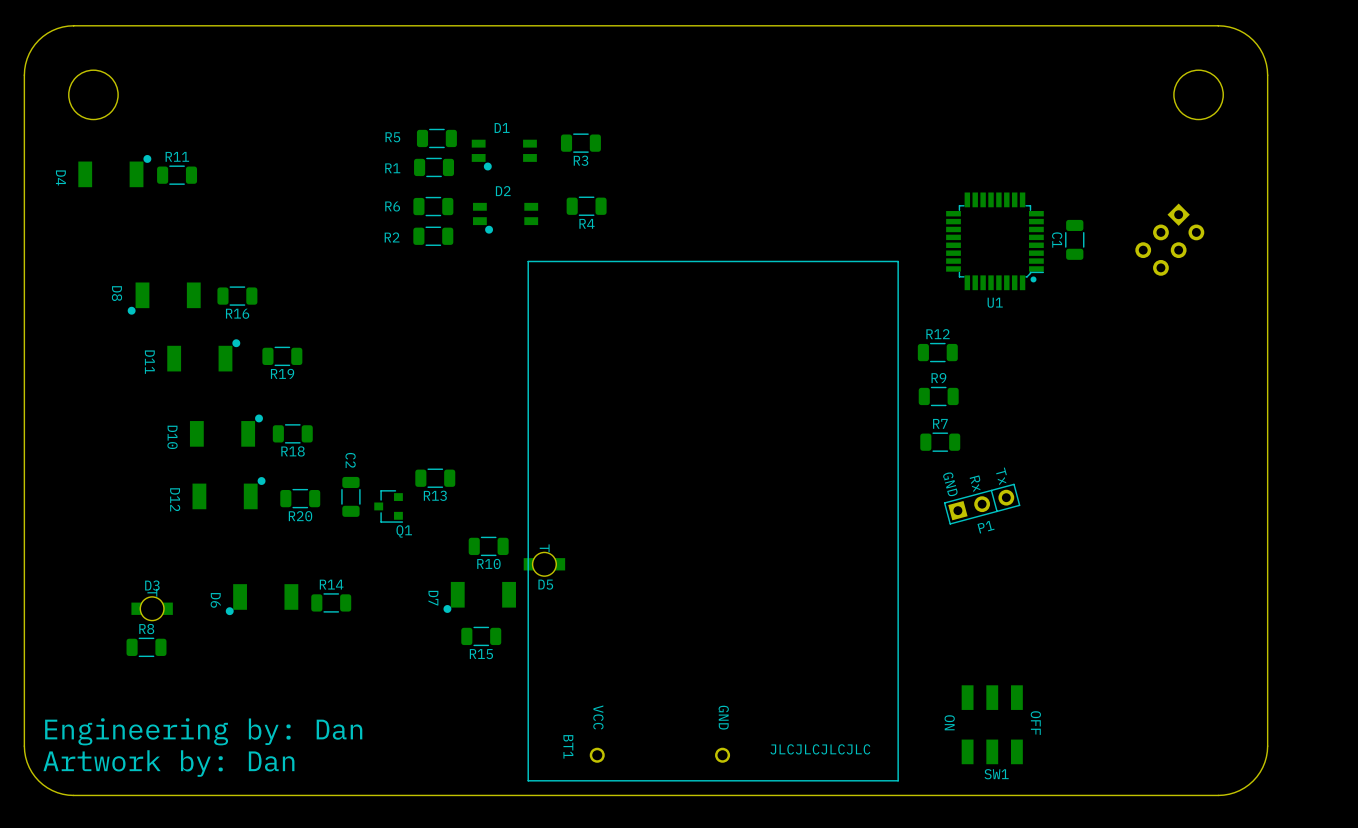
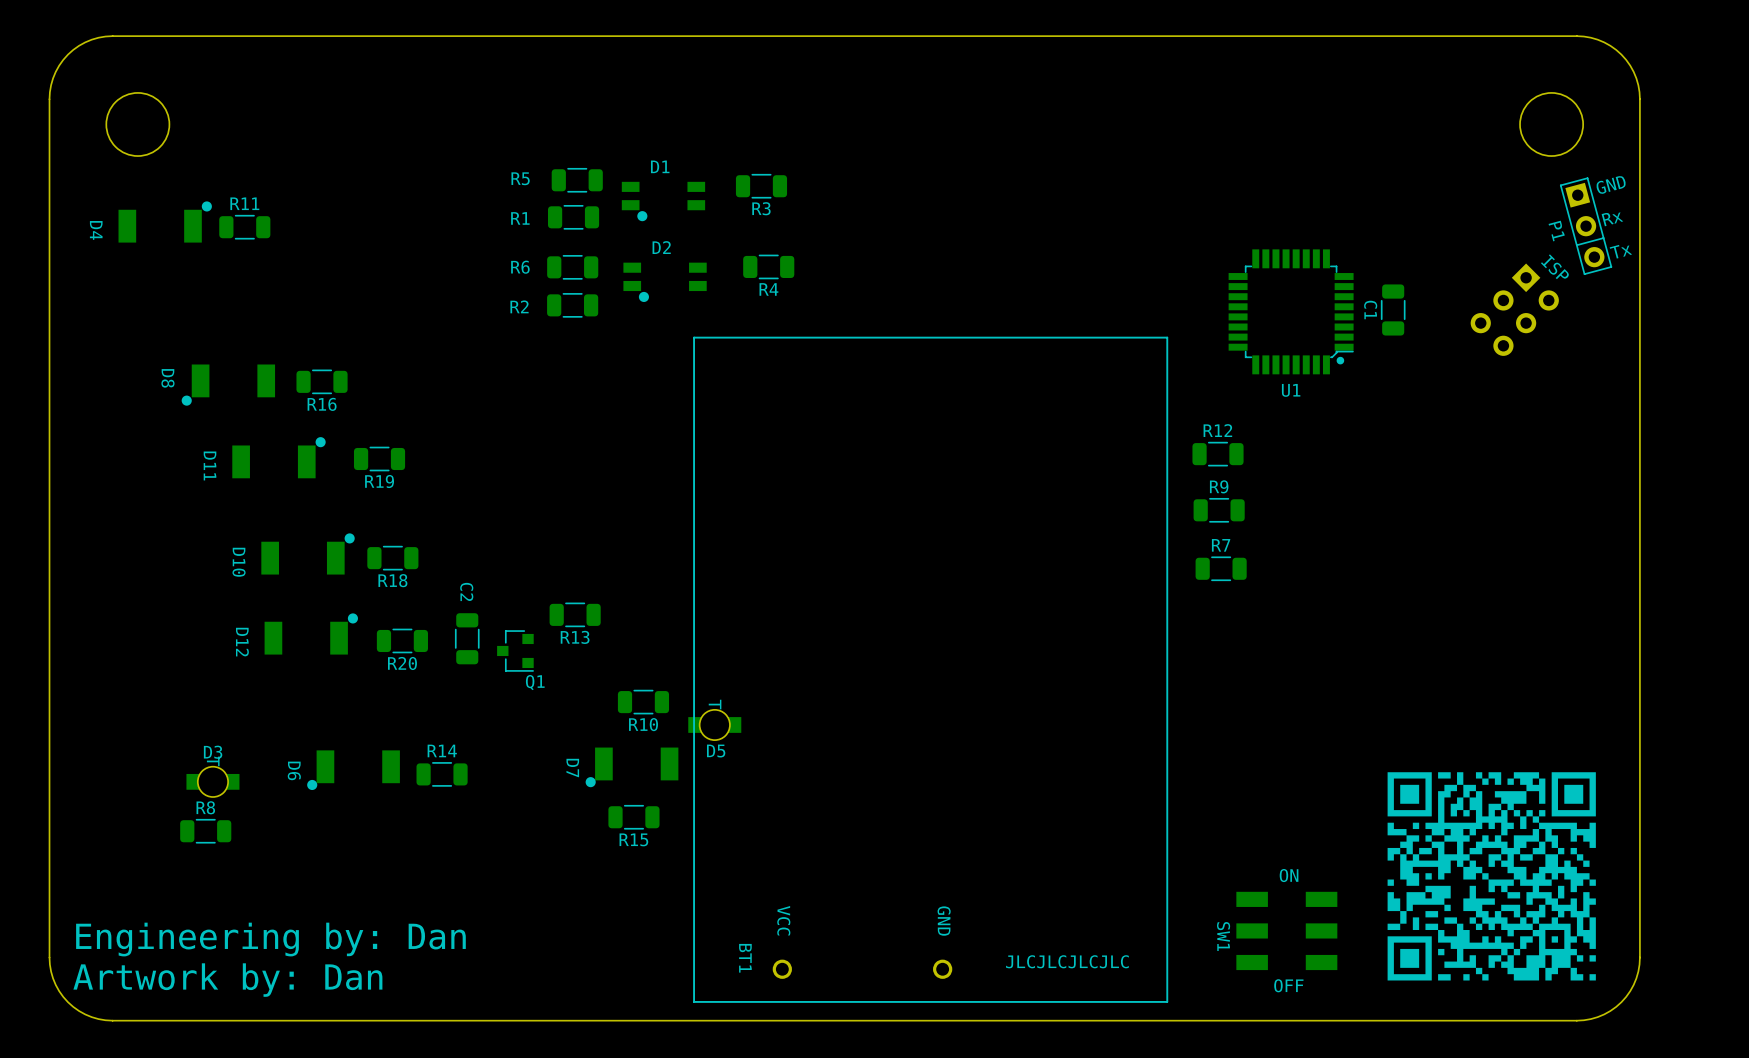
text: none -> ISP (1554, 266)
P1 rotation: 0° (982, 504) -> 90° clockwise (1586, 226)
P1 position: (982, 504) -> (1586, 226)
drawing: none -> [1387, 772, 1596, 981]
SW1 rotation: 0° (992, 724) -> 90° clockwise (1286, 930)

